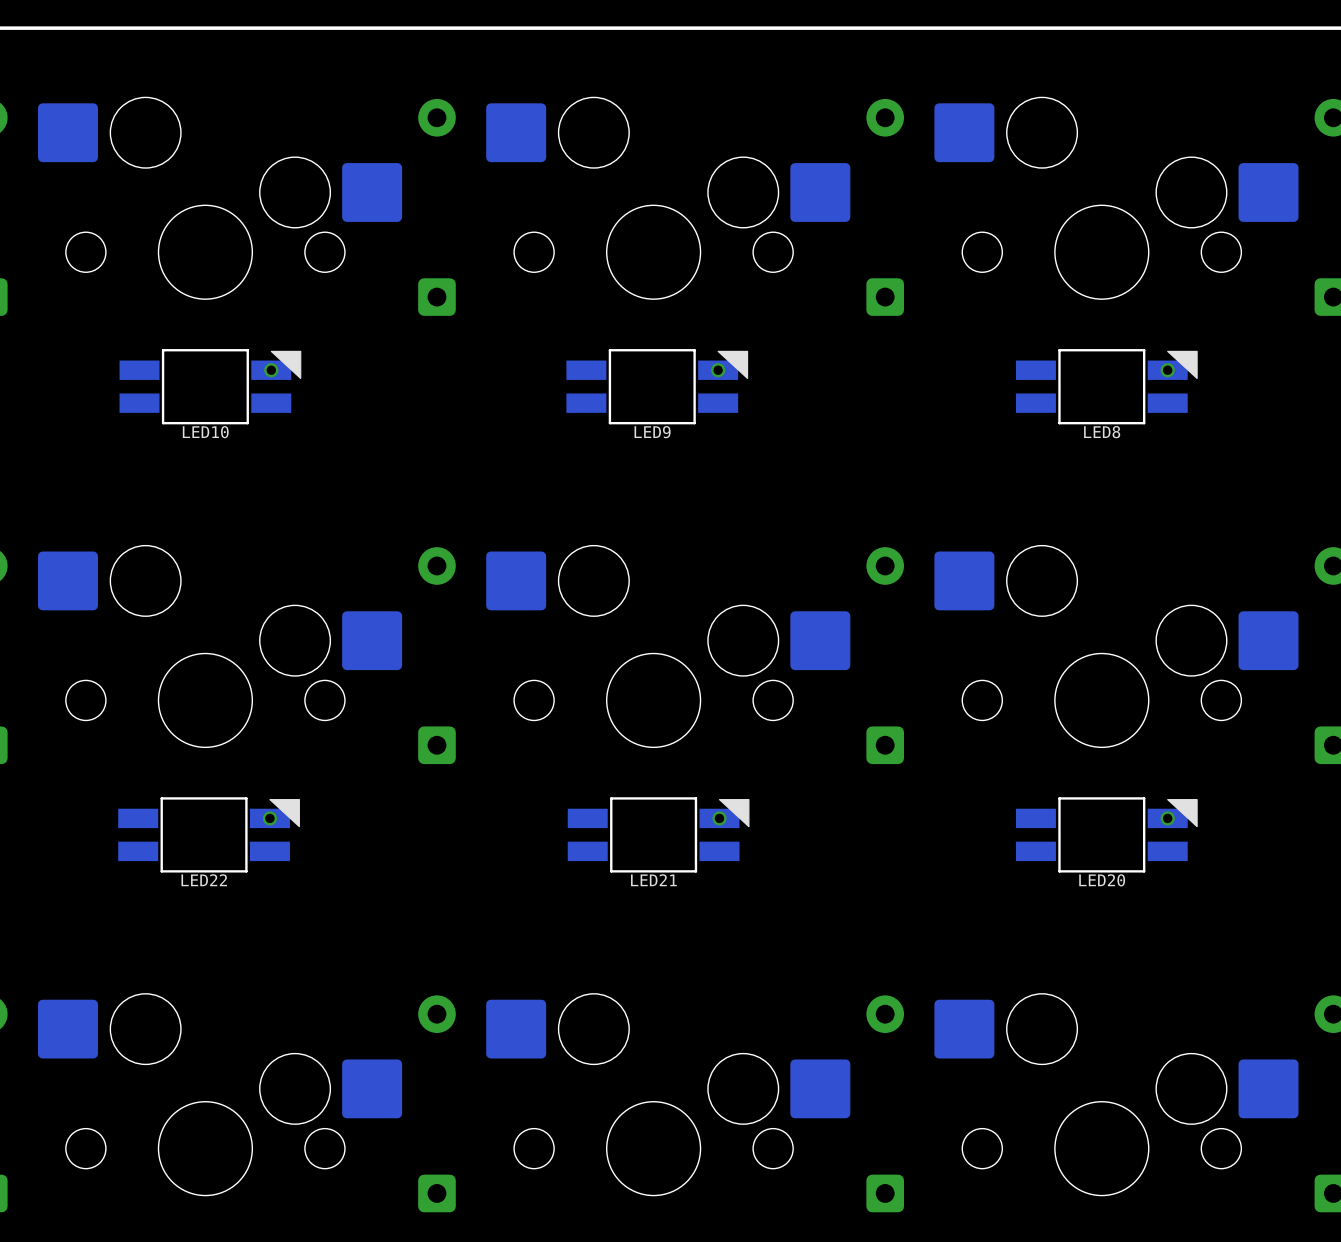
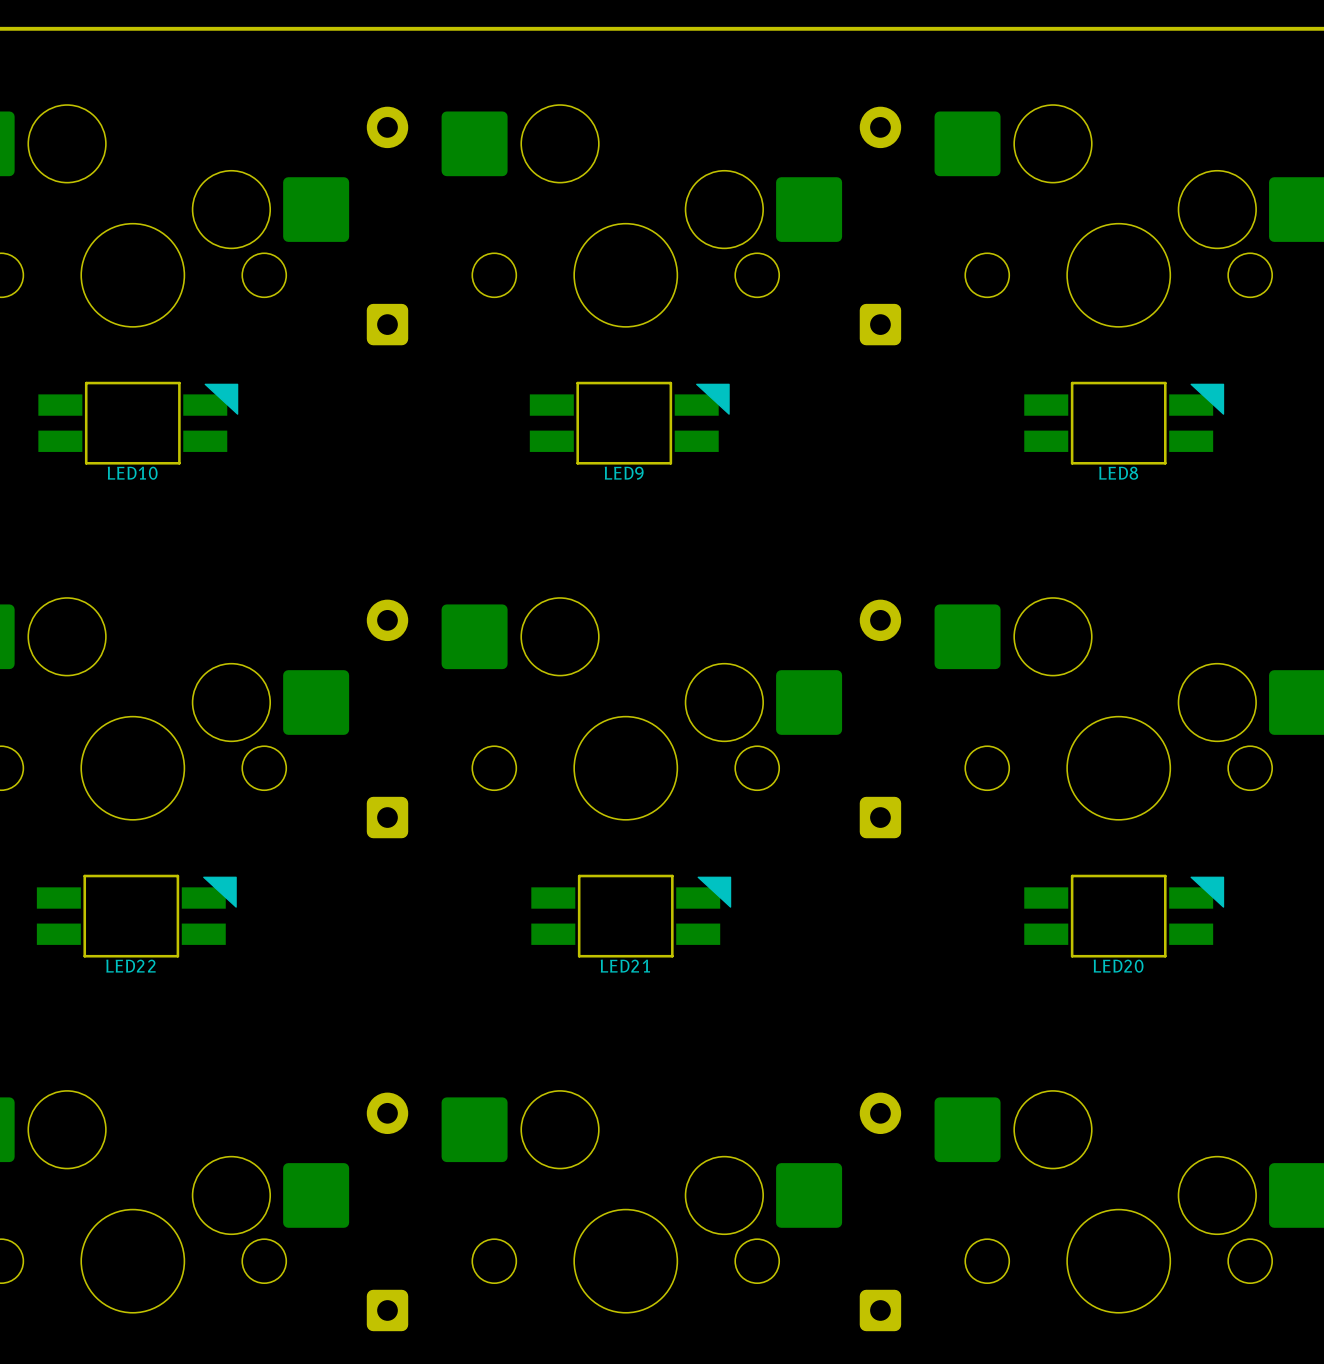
via: (271, 370) -> none
via: (718, 370) -> none
via: (1167, 370) -> none
via: (269, 818) -> none
via: (719, 818) -> none
via: (1167, 818) -> none

